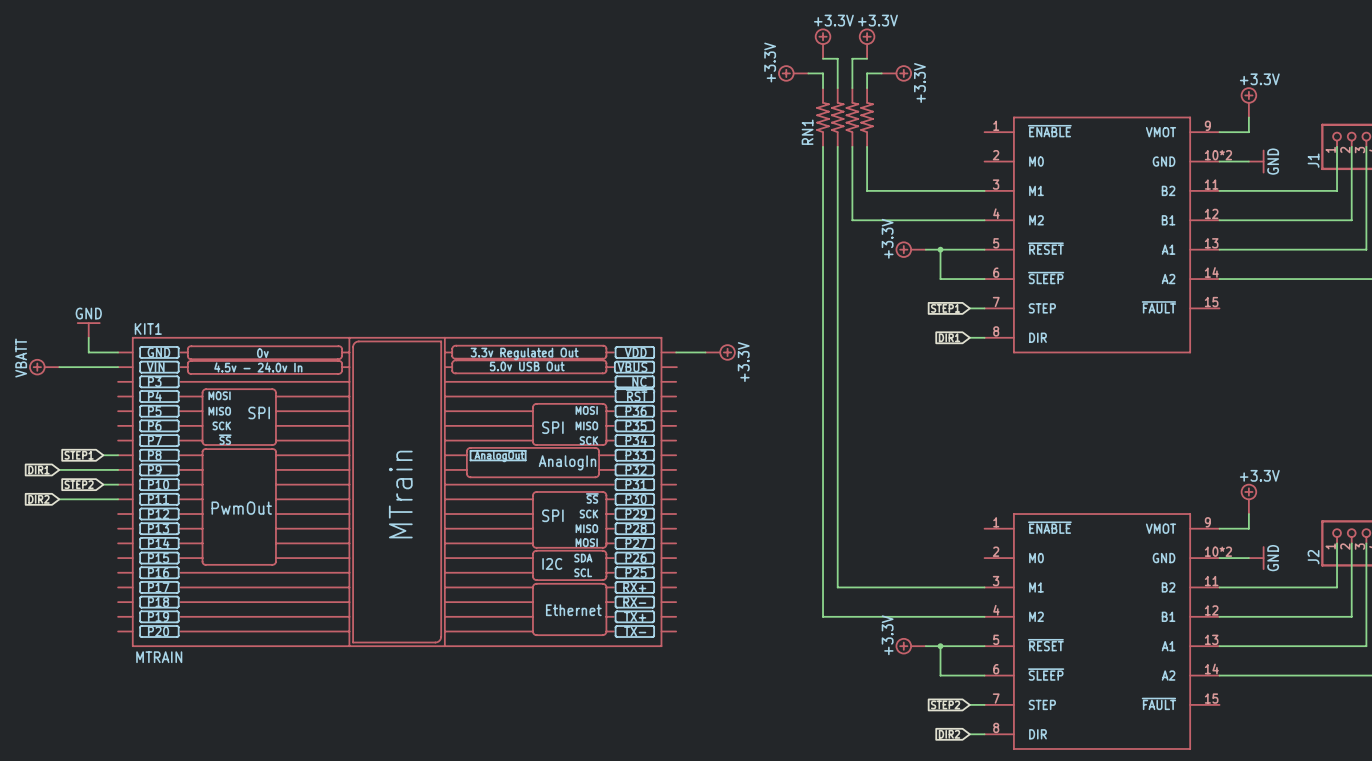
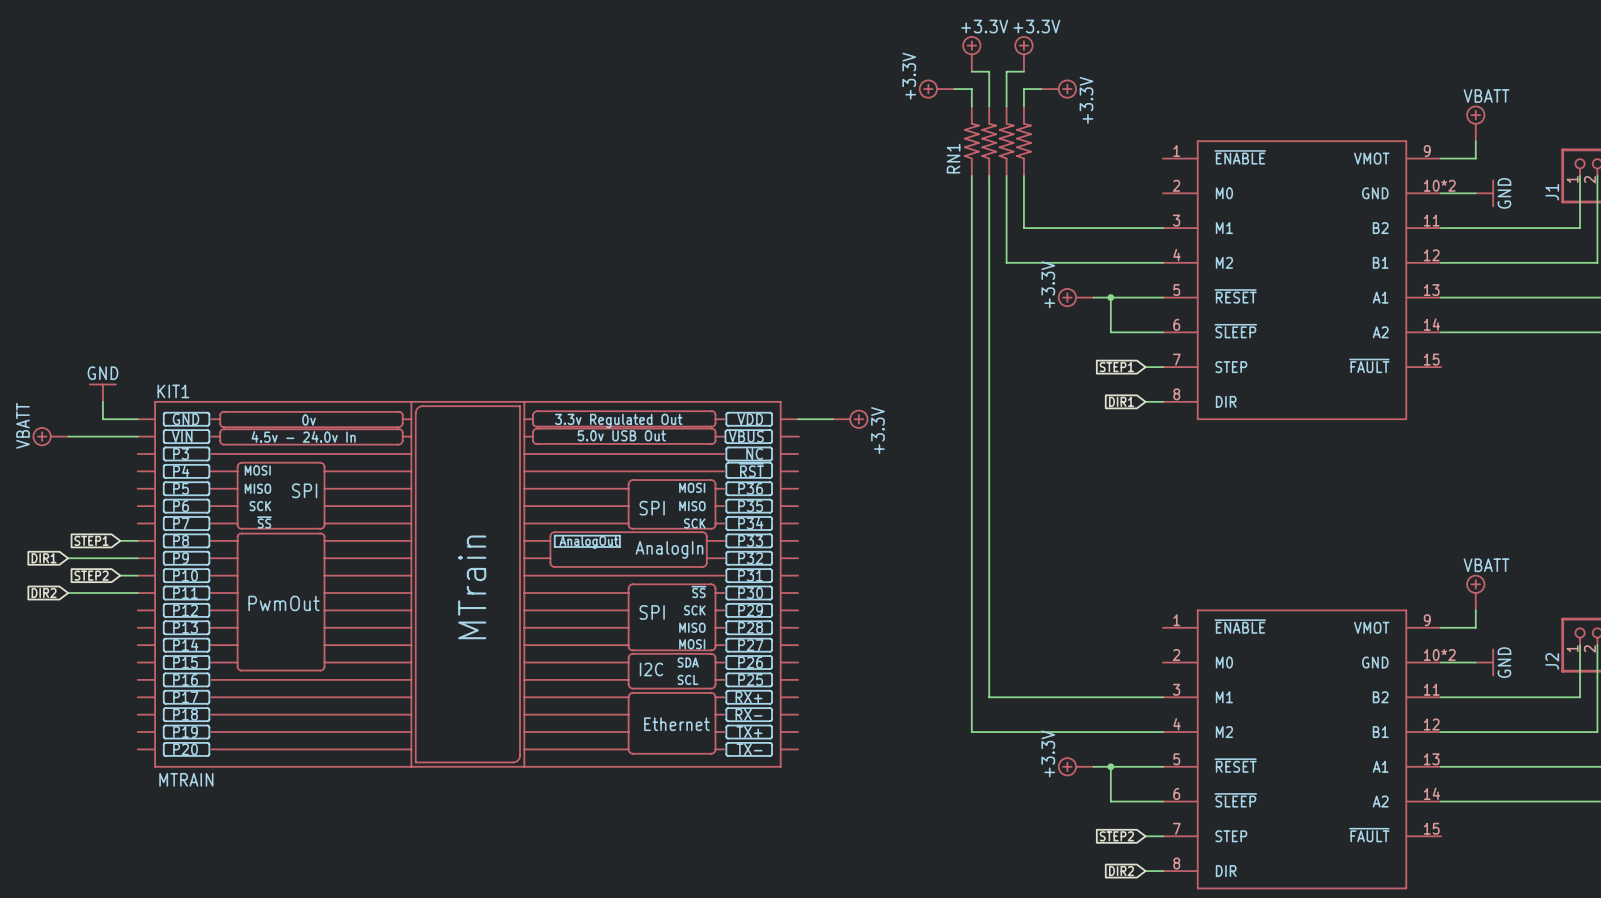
power symbol: +3.3V (1248, 102) -> VBATT (1475, 123)
power symbol: +3.3V (1248, 498) -> VBATT (1475, 592)

